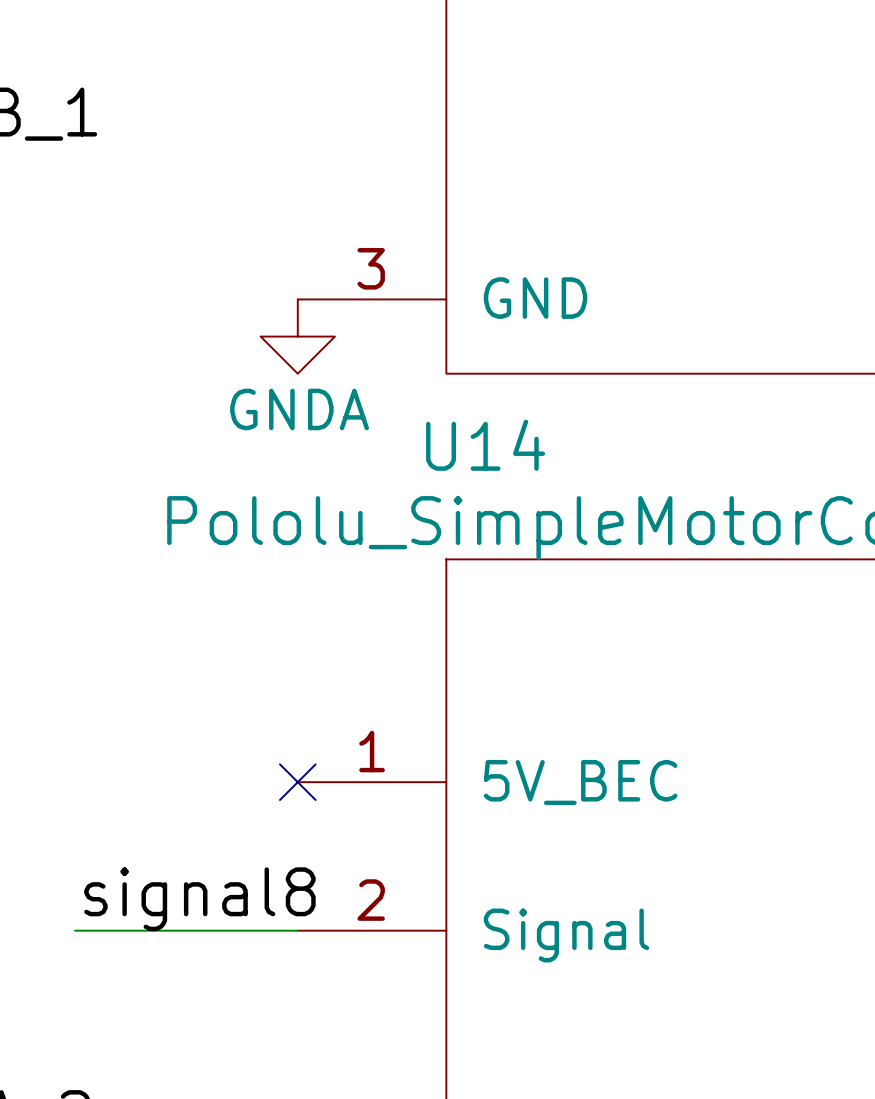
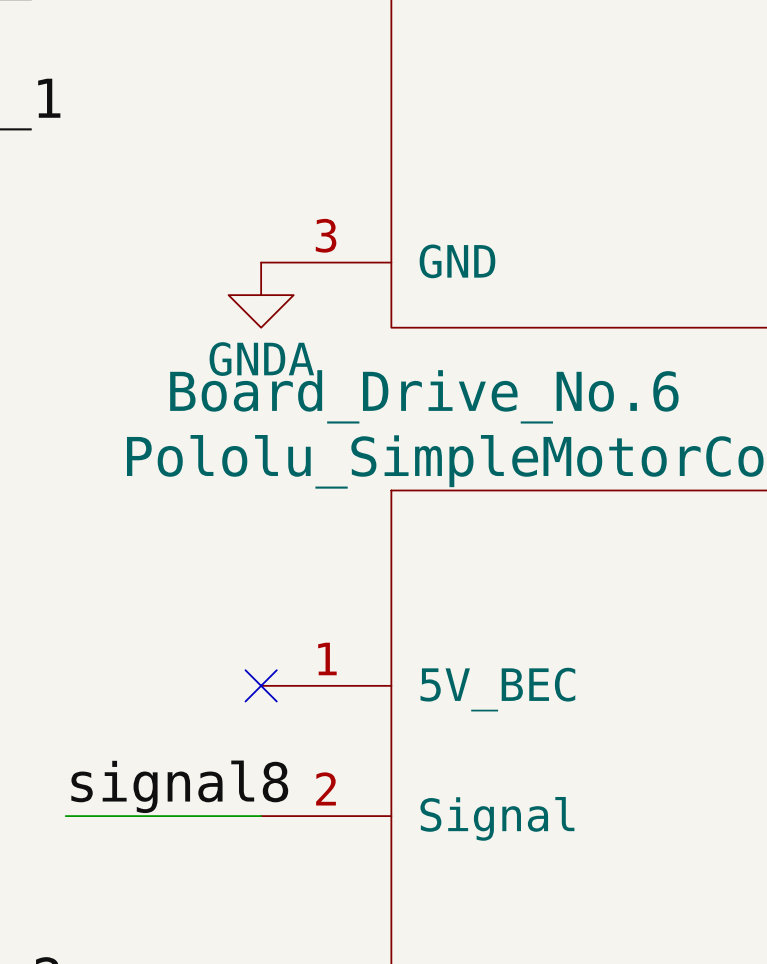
U14 name: U14 (485, 445) -> Board_Drive_No.6 (424, 396)

